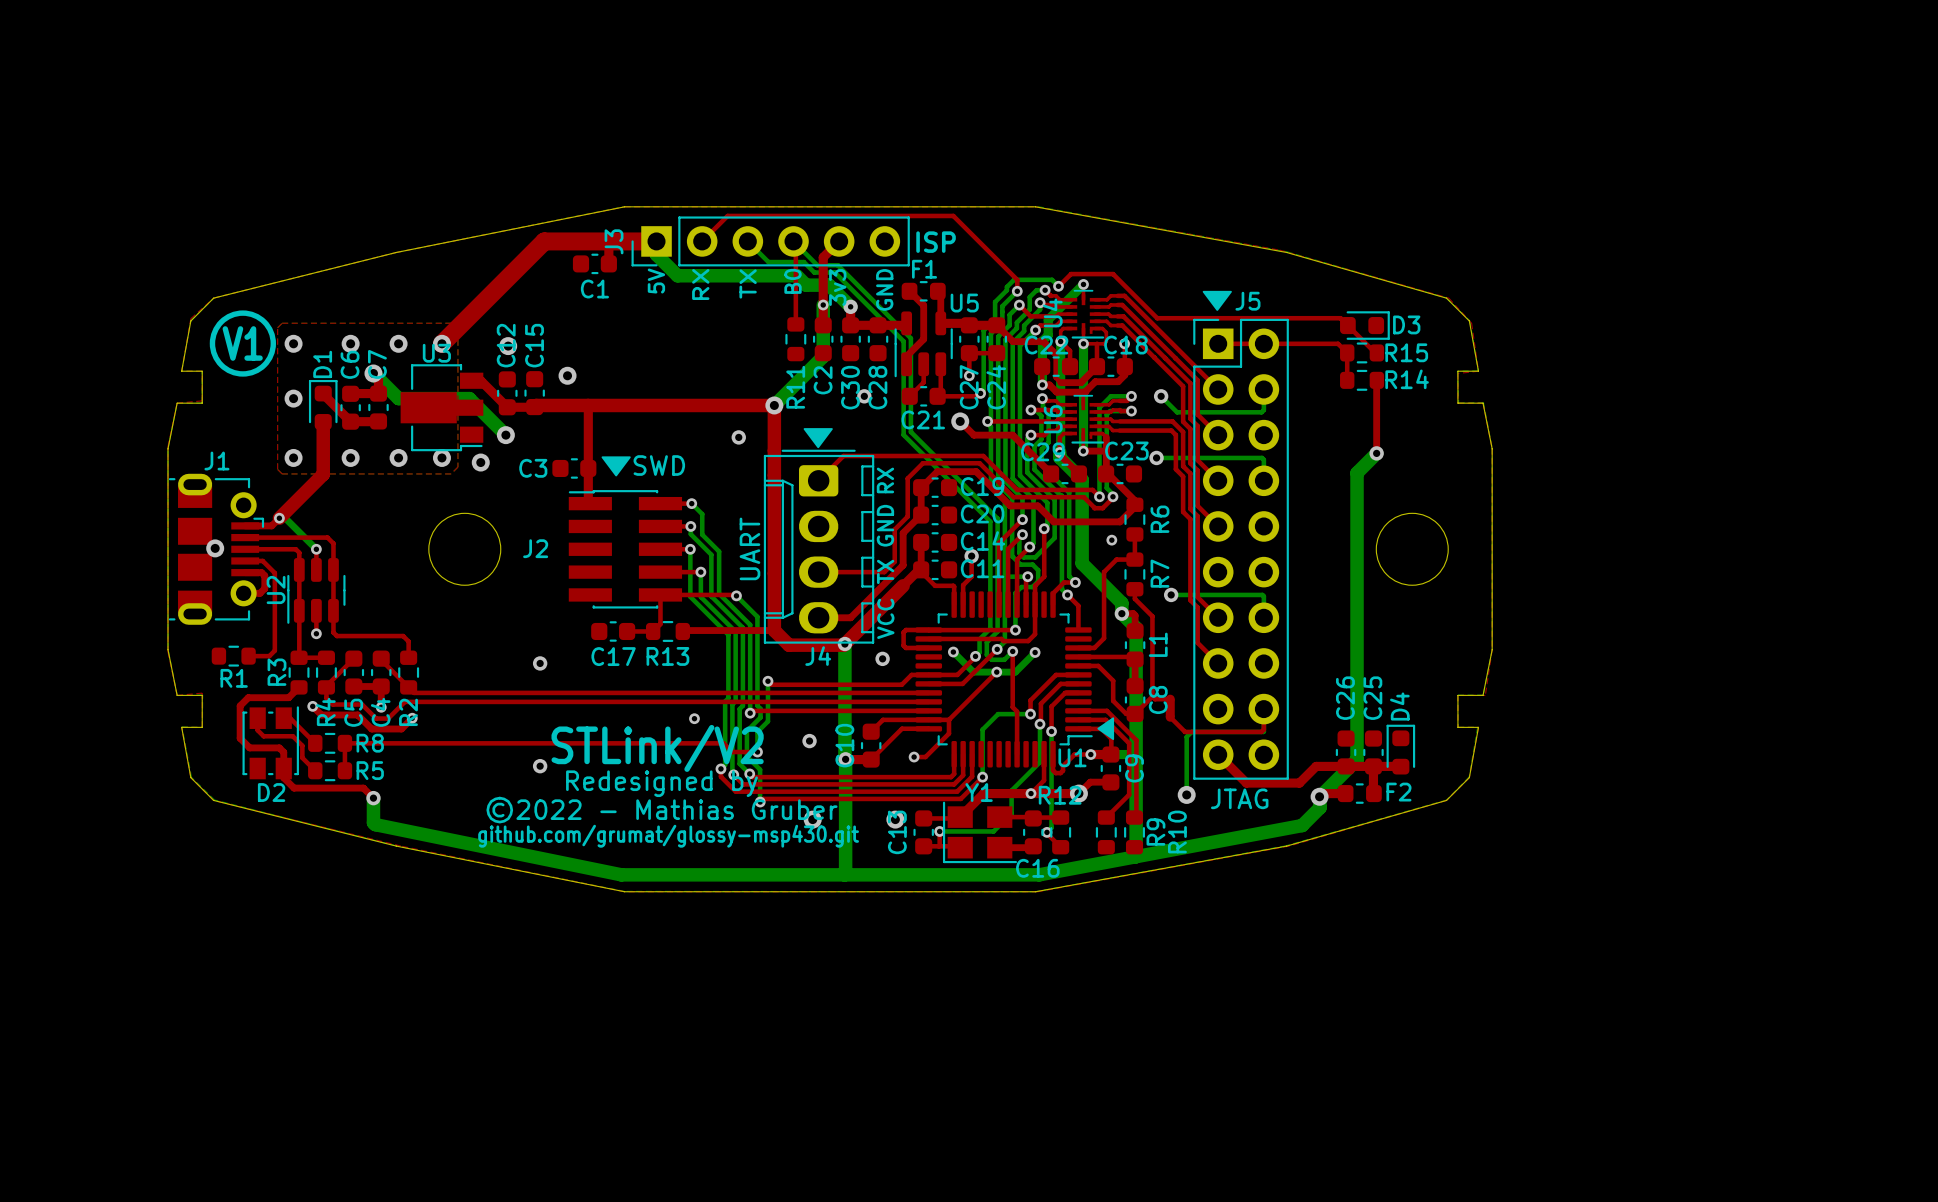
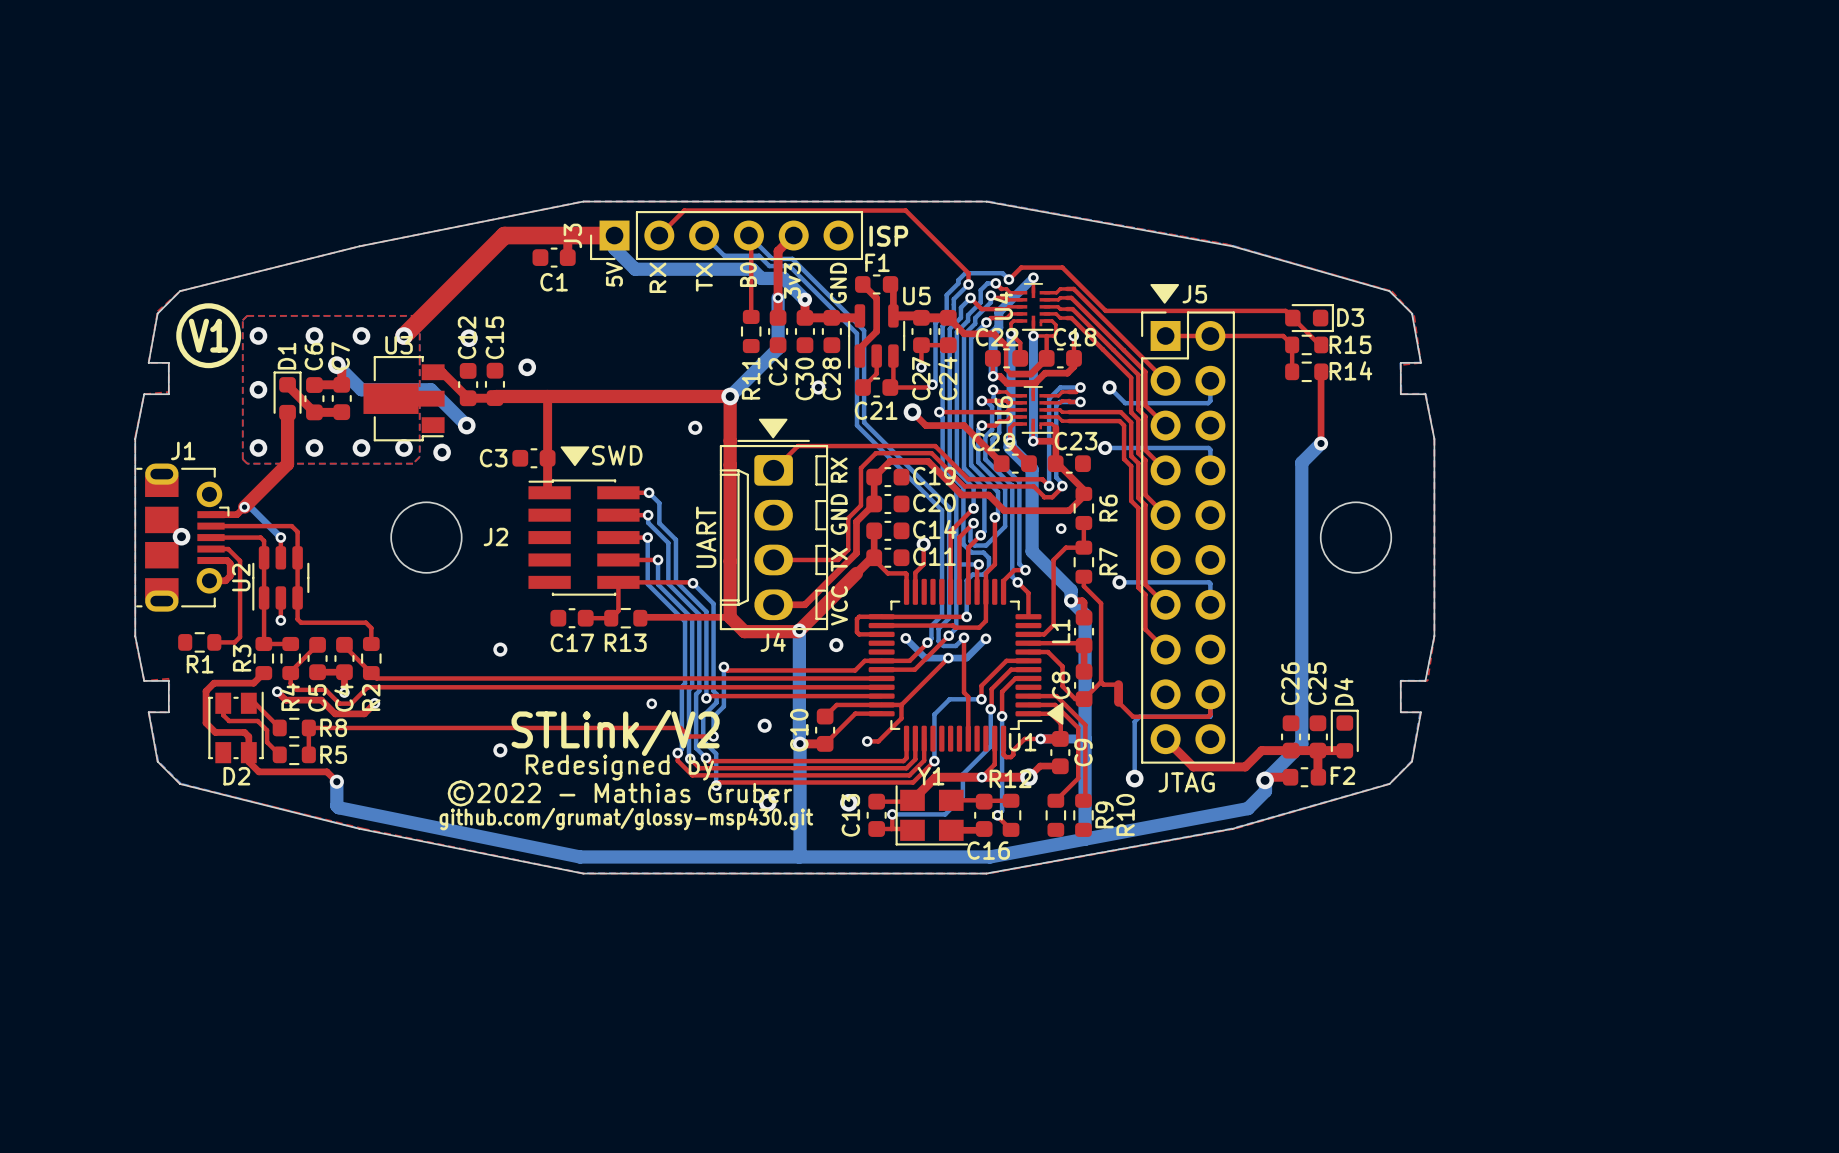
L1 name position: L1 (1158, 644) -> L1 (1061, 631)
C8 name position: C8 (1158, 699) -> C8 (1061, 685)

